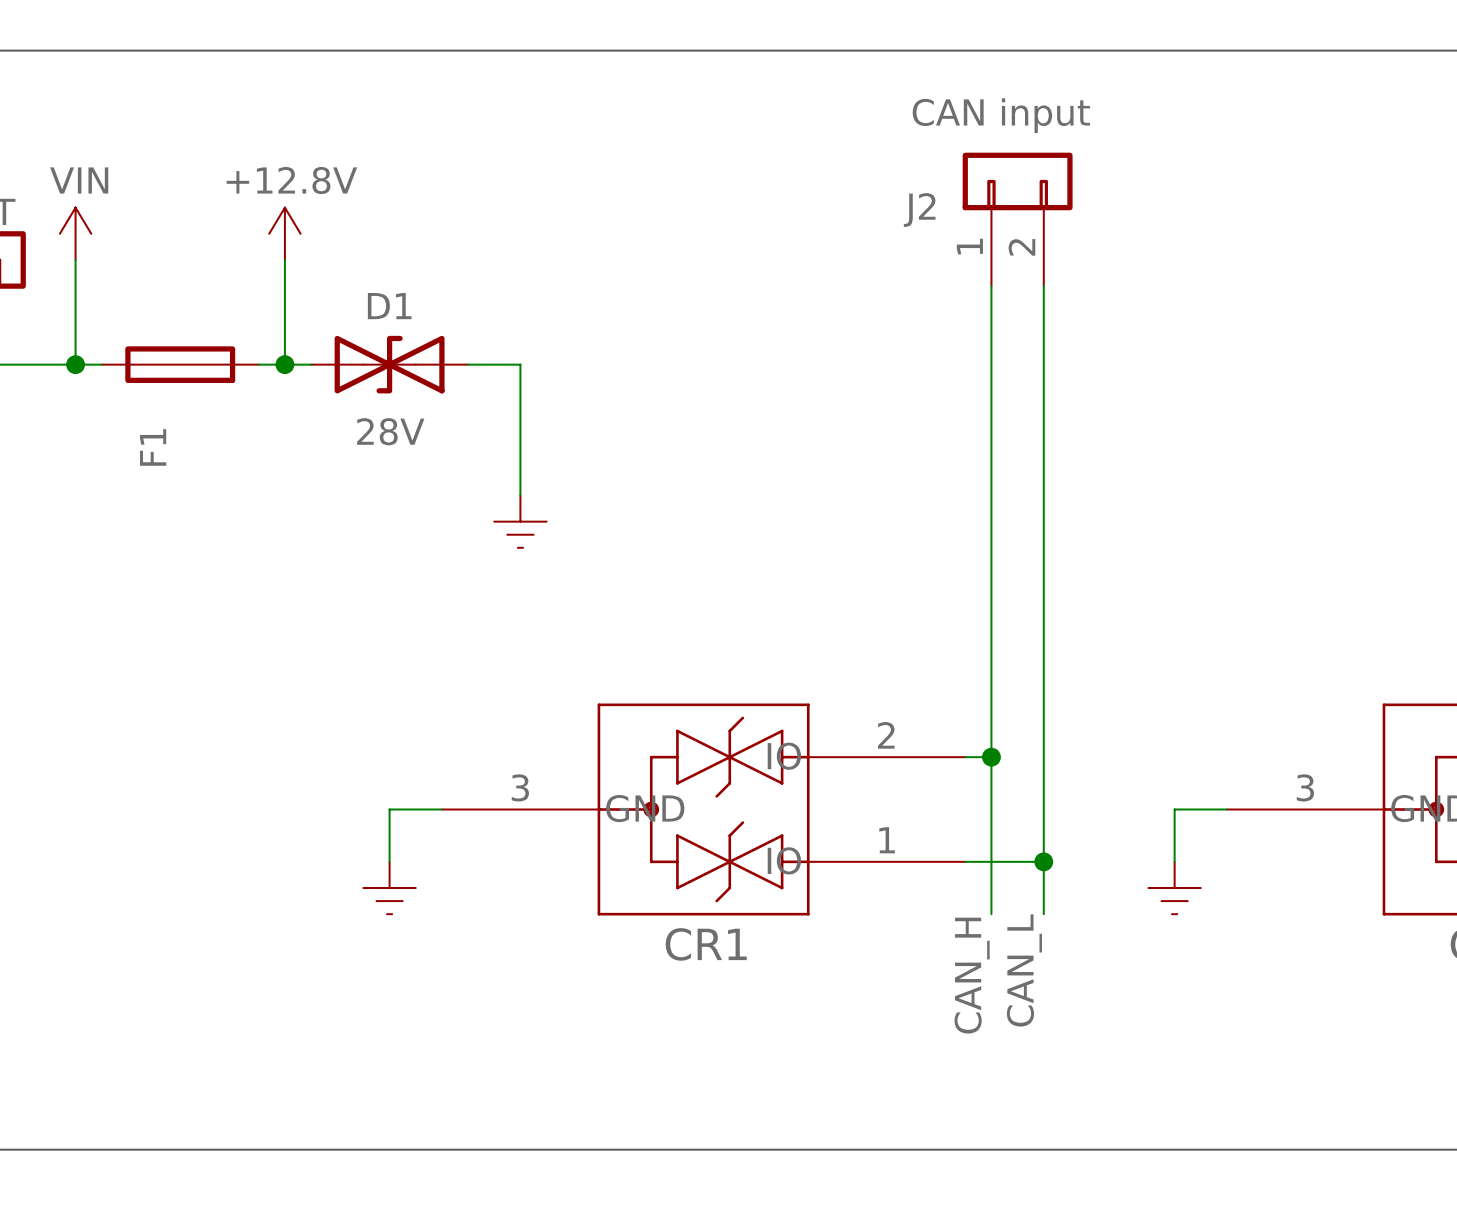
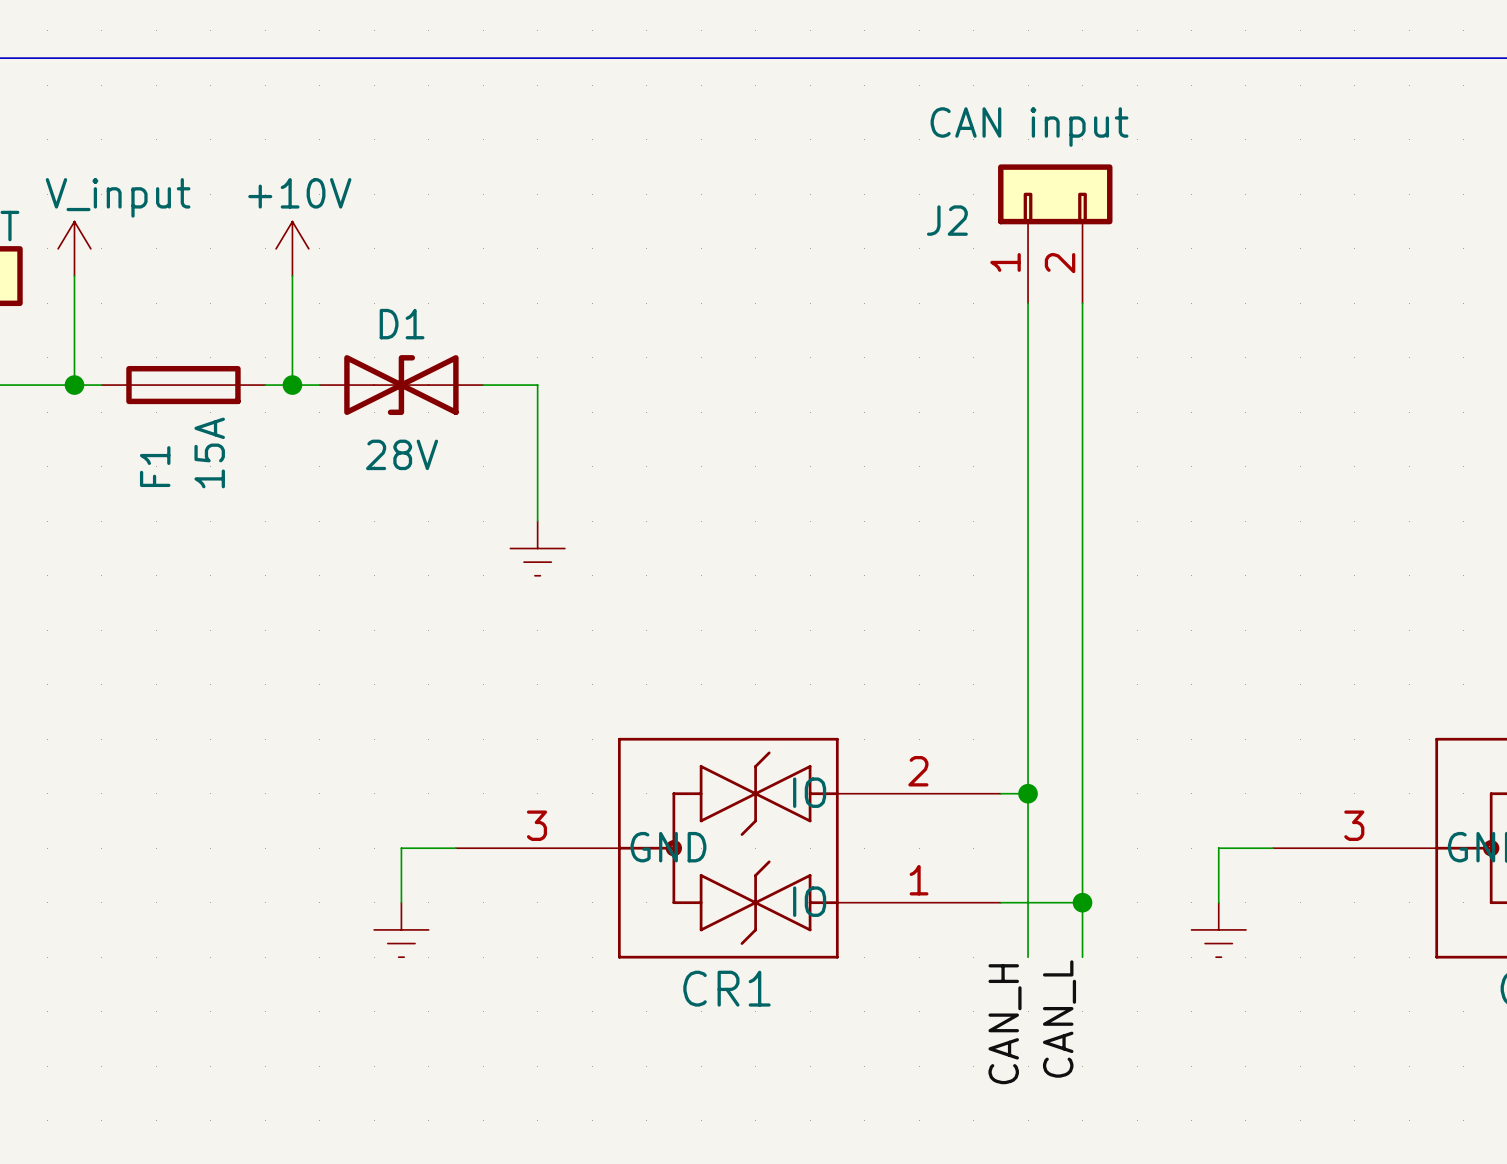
power symbol: VIN (75, 233) -> V_input (74, 248)
power symbol: +12.8V (284, 233) -> +10V (292, 248)
F1 value: none -> 15A (209, 452)

